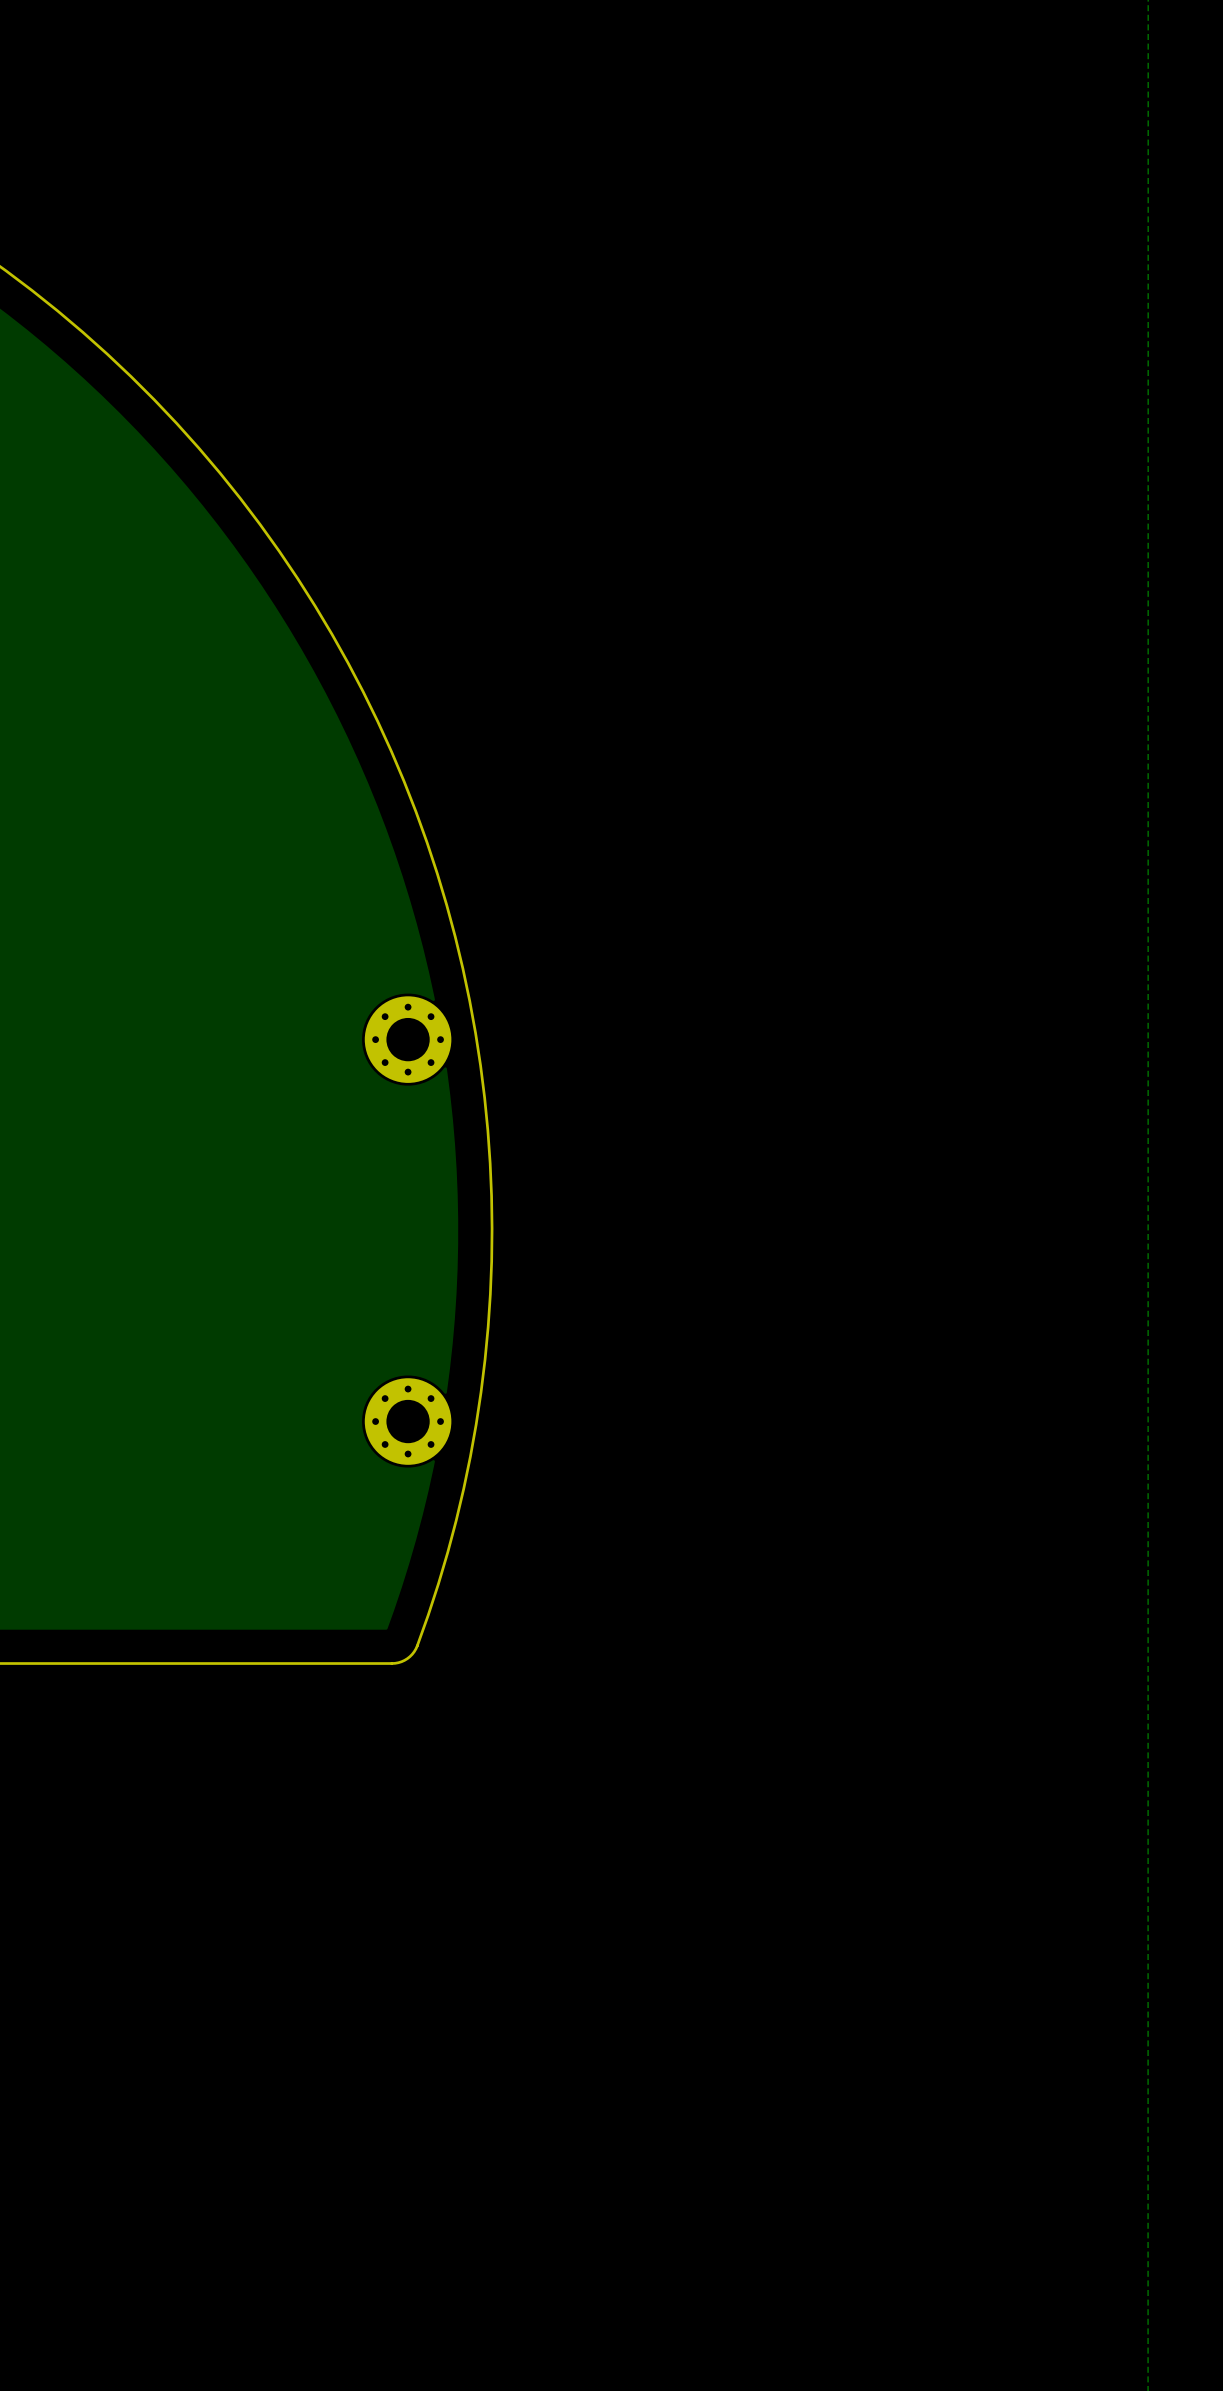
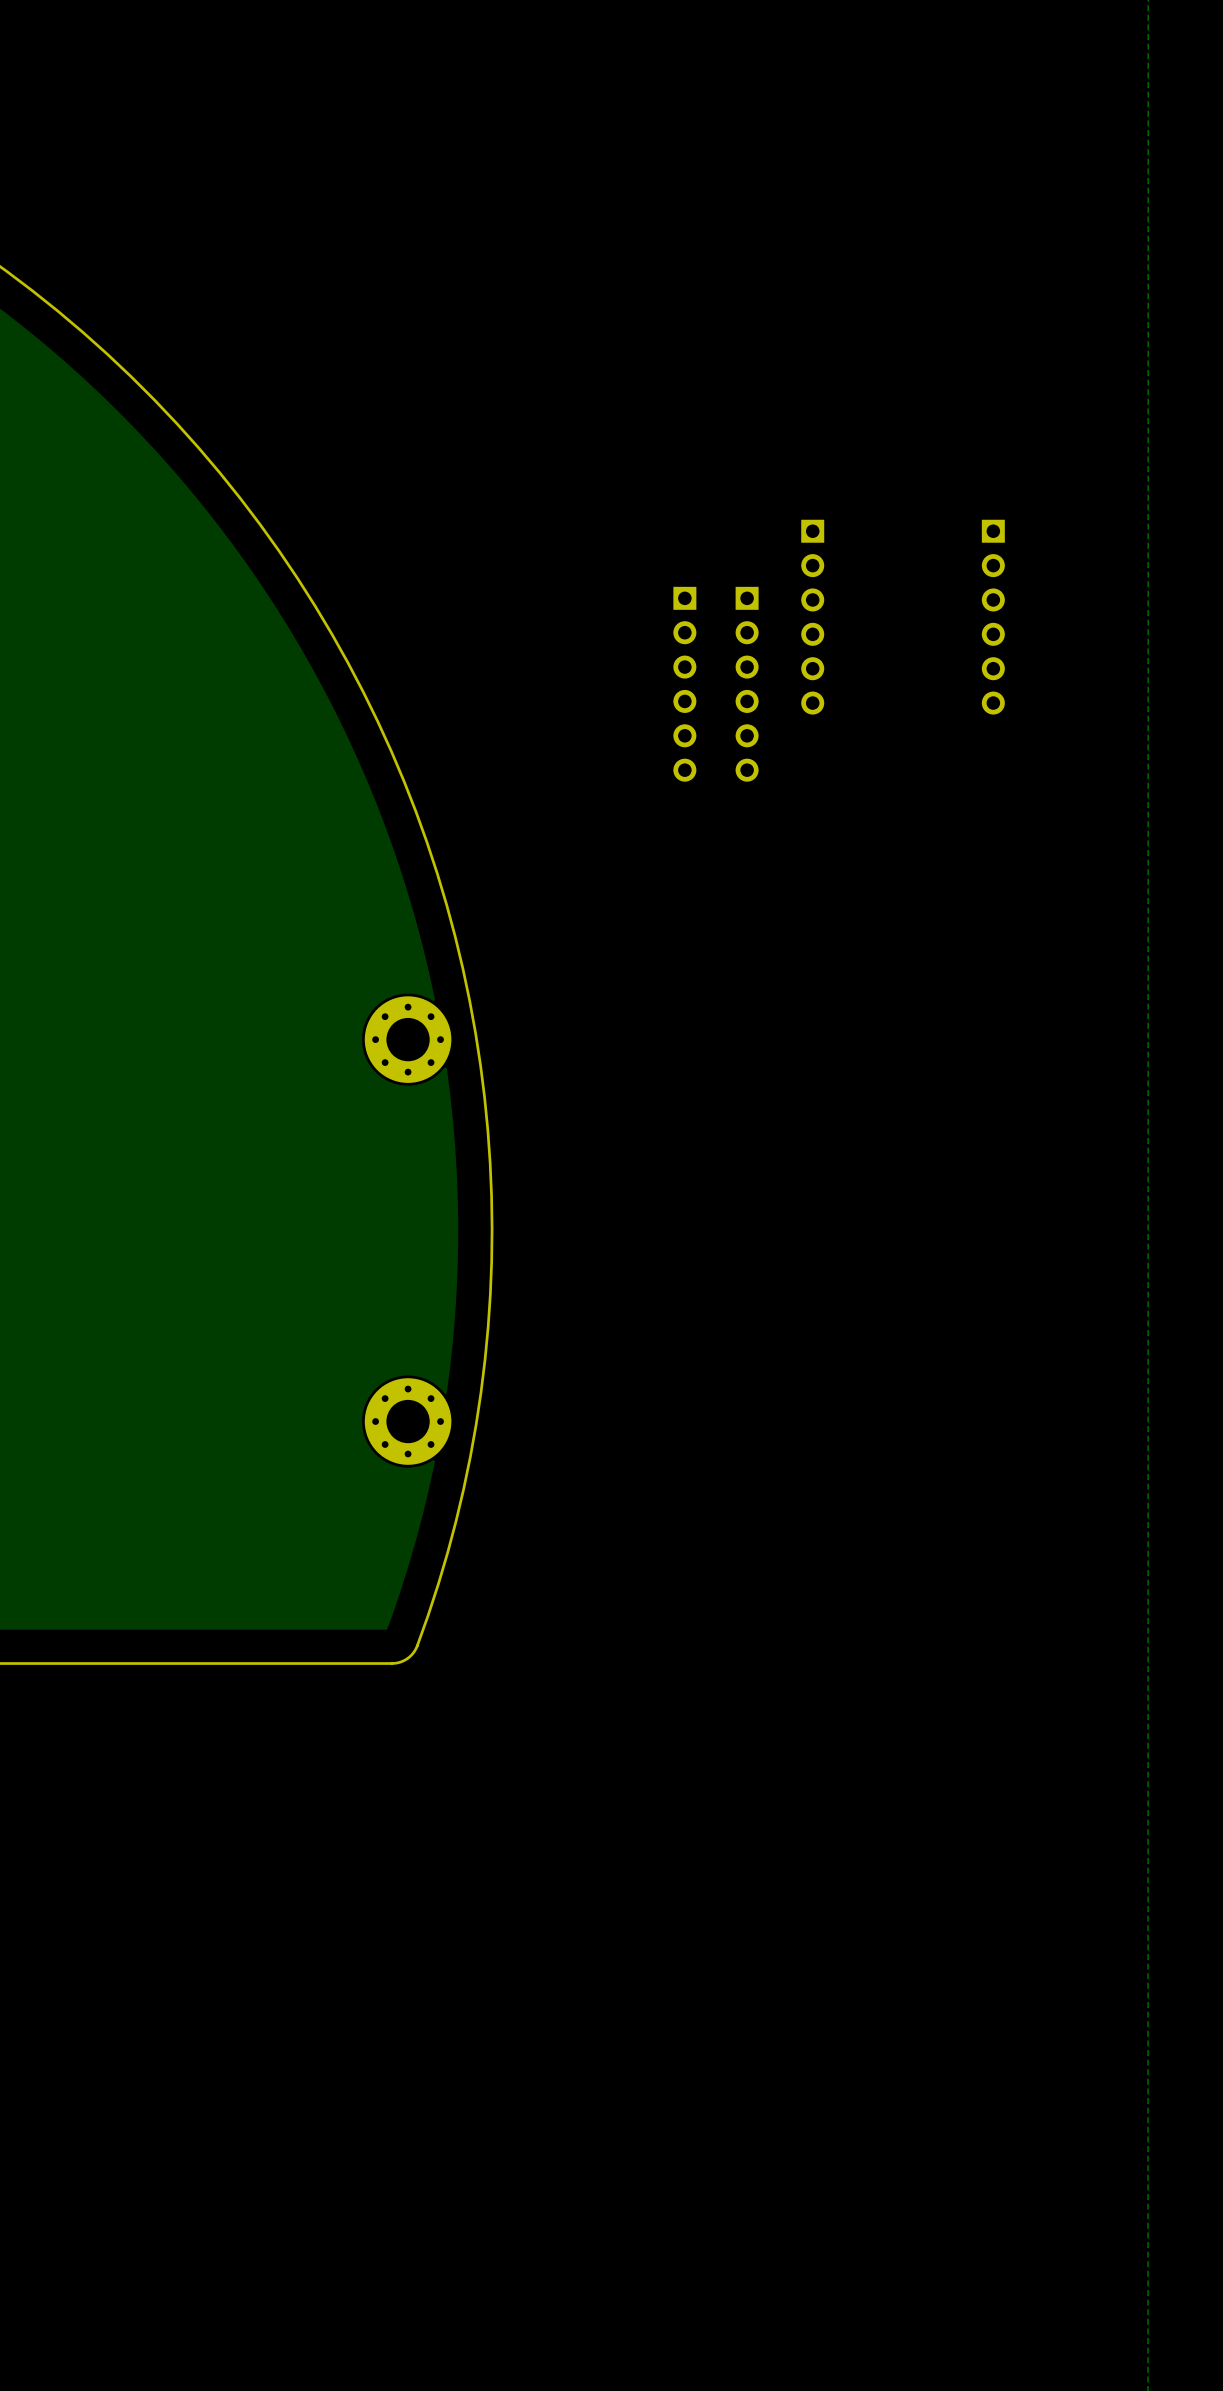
part: none -> (812, 617)
part: none -> (993, 617)
part: none -> (684, 684)
part: none -> (747, 684)

